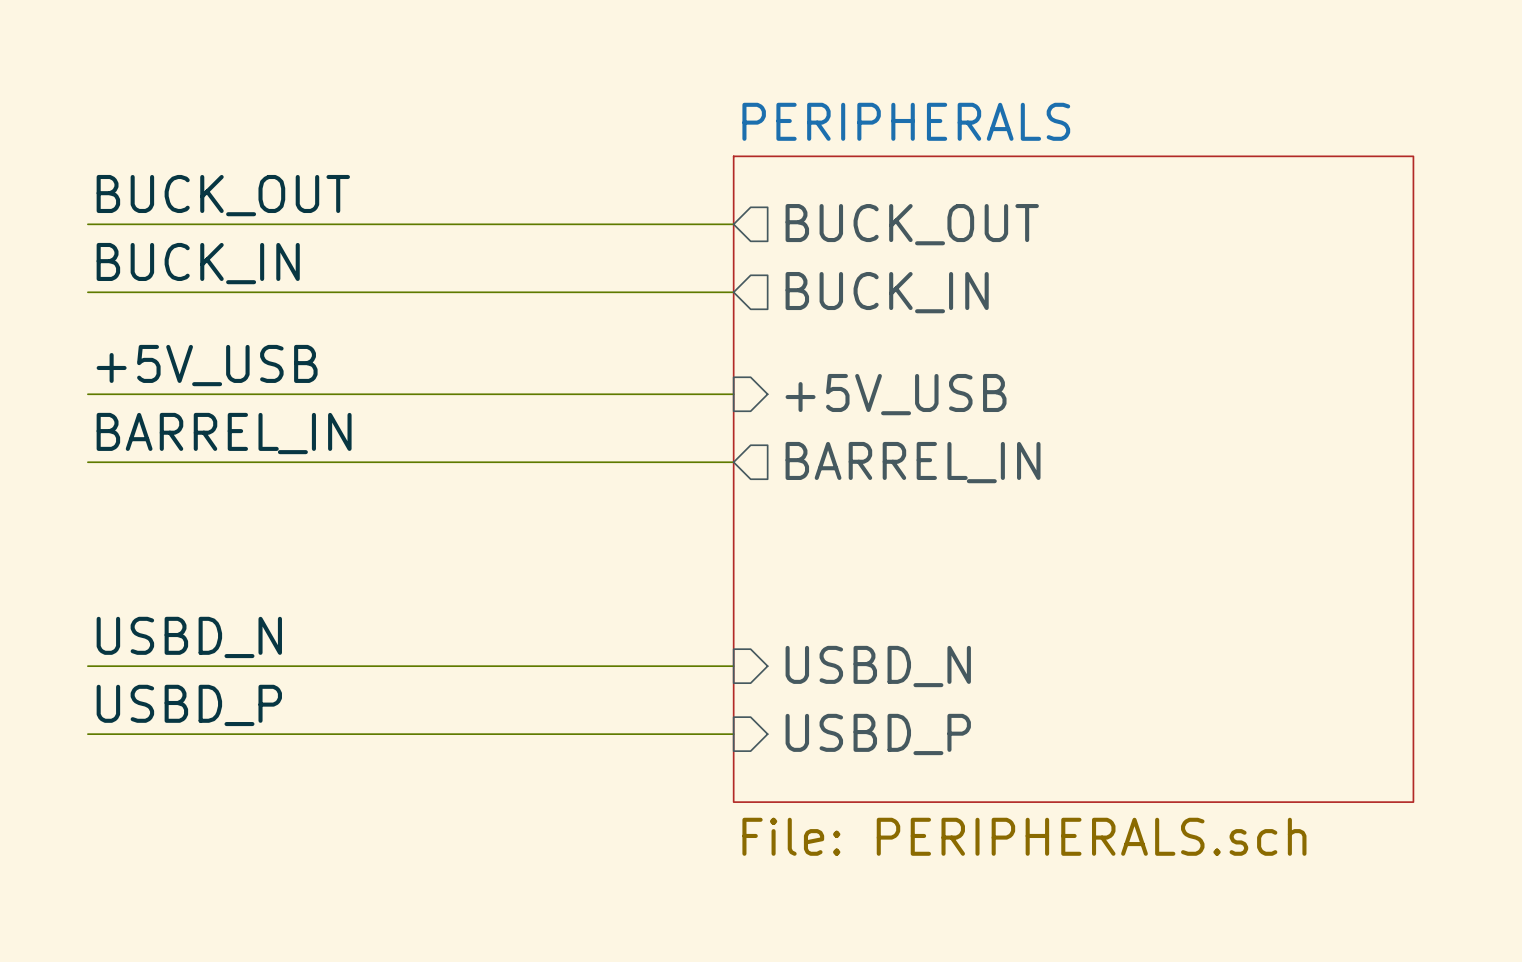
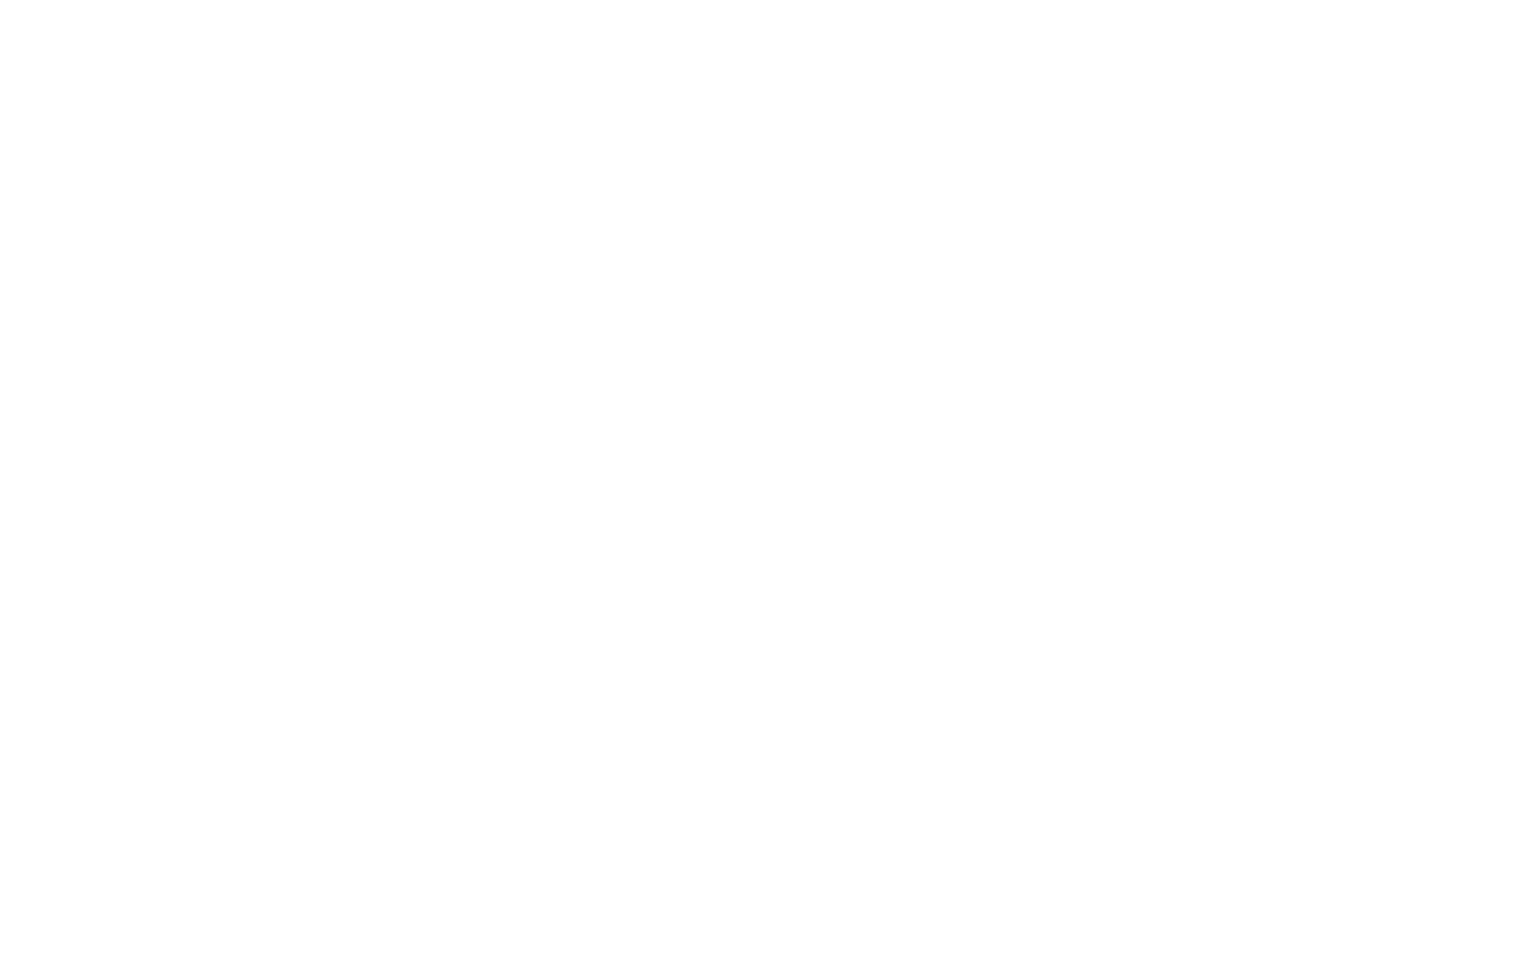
label: BUCK_OUT (223, 195) -> none
wire: (87, 224) (733, 224) -> none
sheet pin: BUCK_OUT (912, 224) -> none
label: BUCK_IN (198, 263) -> none
wire: (87, 292) (733, 292) -> none
sheet pin: BUCK_IN (887, 292) -> none
label: +5V_USB (207, 365) -> none
wire: (87, 394) (733, 394) -> none
sheet pin: +5V_USB (896, 394) -> none
label: BARREL_IN (224, 433) -> none
wire: (87, 462) (733, 462) -> none
sheet pin: BARREL_IN (913, 462) -> none
sheet PERIPHERALS: File: PERIPHERALS.sch (1073, 479) -> none
label: USBD_N (189, 637) -> none
wire: (87, 666) (733, 666) -> none
sheet pin: USBD_N (878, 666) -> none
label: USBD_P (189, 705) -> none
wire: (87, 734) (733, 734) -> none
sheet pin: USBD_P (878, 734) -> none

